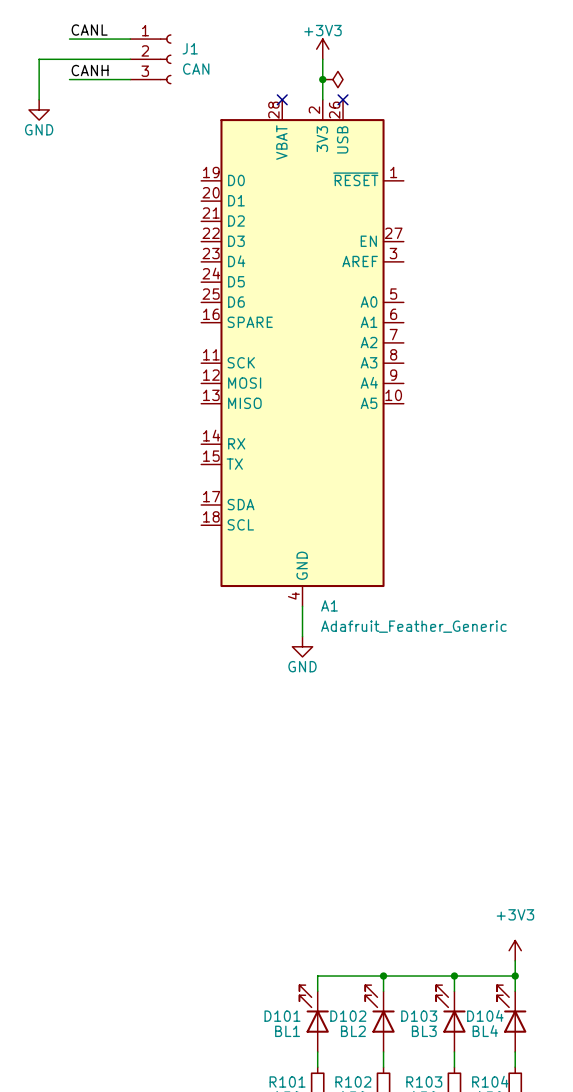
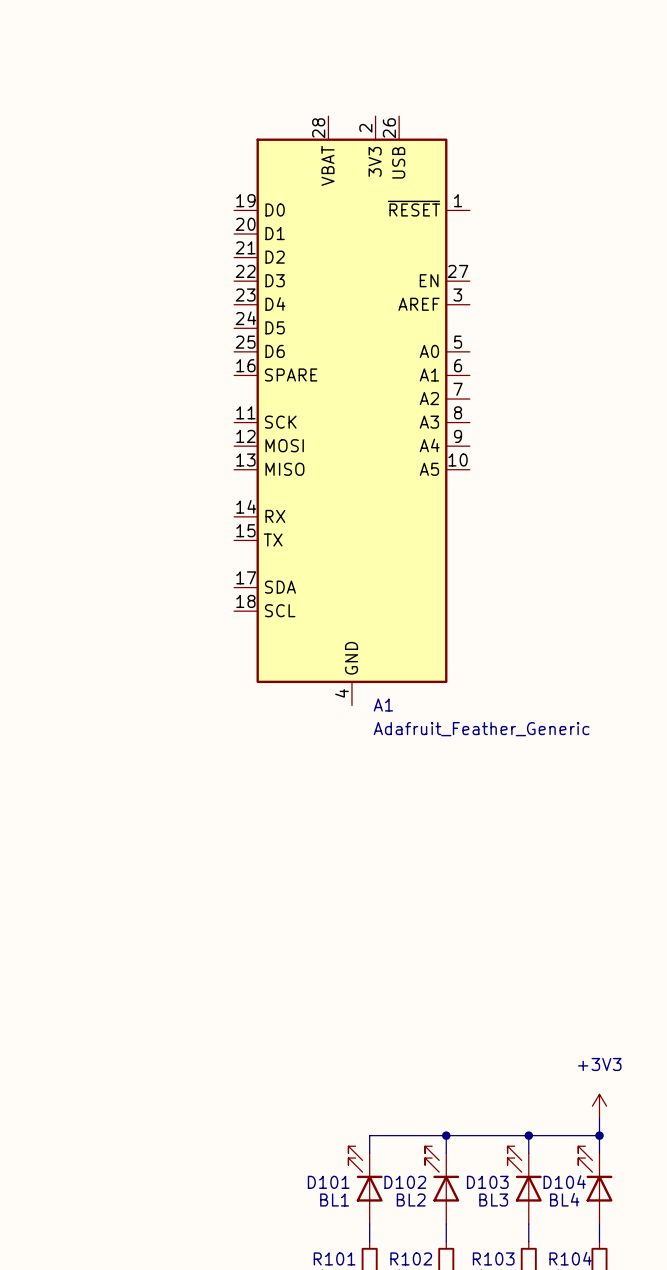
label: CANL (89, 30) -> none
wire: (69, 39) (130, 39) -> none
power symbol: +3V3 (322, 49) -> none
wire: (130, 59) (39, 59) (39, 99) -> none
J1: CAN (150, 59) -> none
wire: (322, 59) (322, 99) -> none
label: CANH (90, 70) -> none
wire: (69, 79) (130, 79) -> none
junction: (322, 79) -> none
power symbol: (332, 79) -> none
no-connect mark: (282, 99) -> none
no-connect mark: (343, 99) -> none
power symbol: GND (39, 109) -> none
wire: (302, 606) (302, 636) -> none
power symbol: GND (302, 646) -> none

